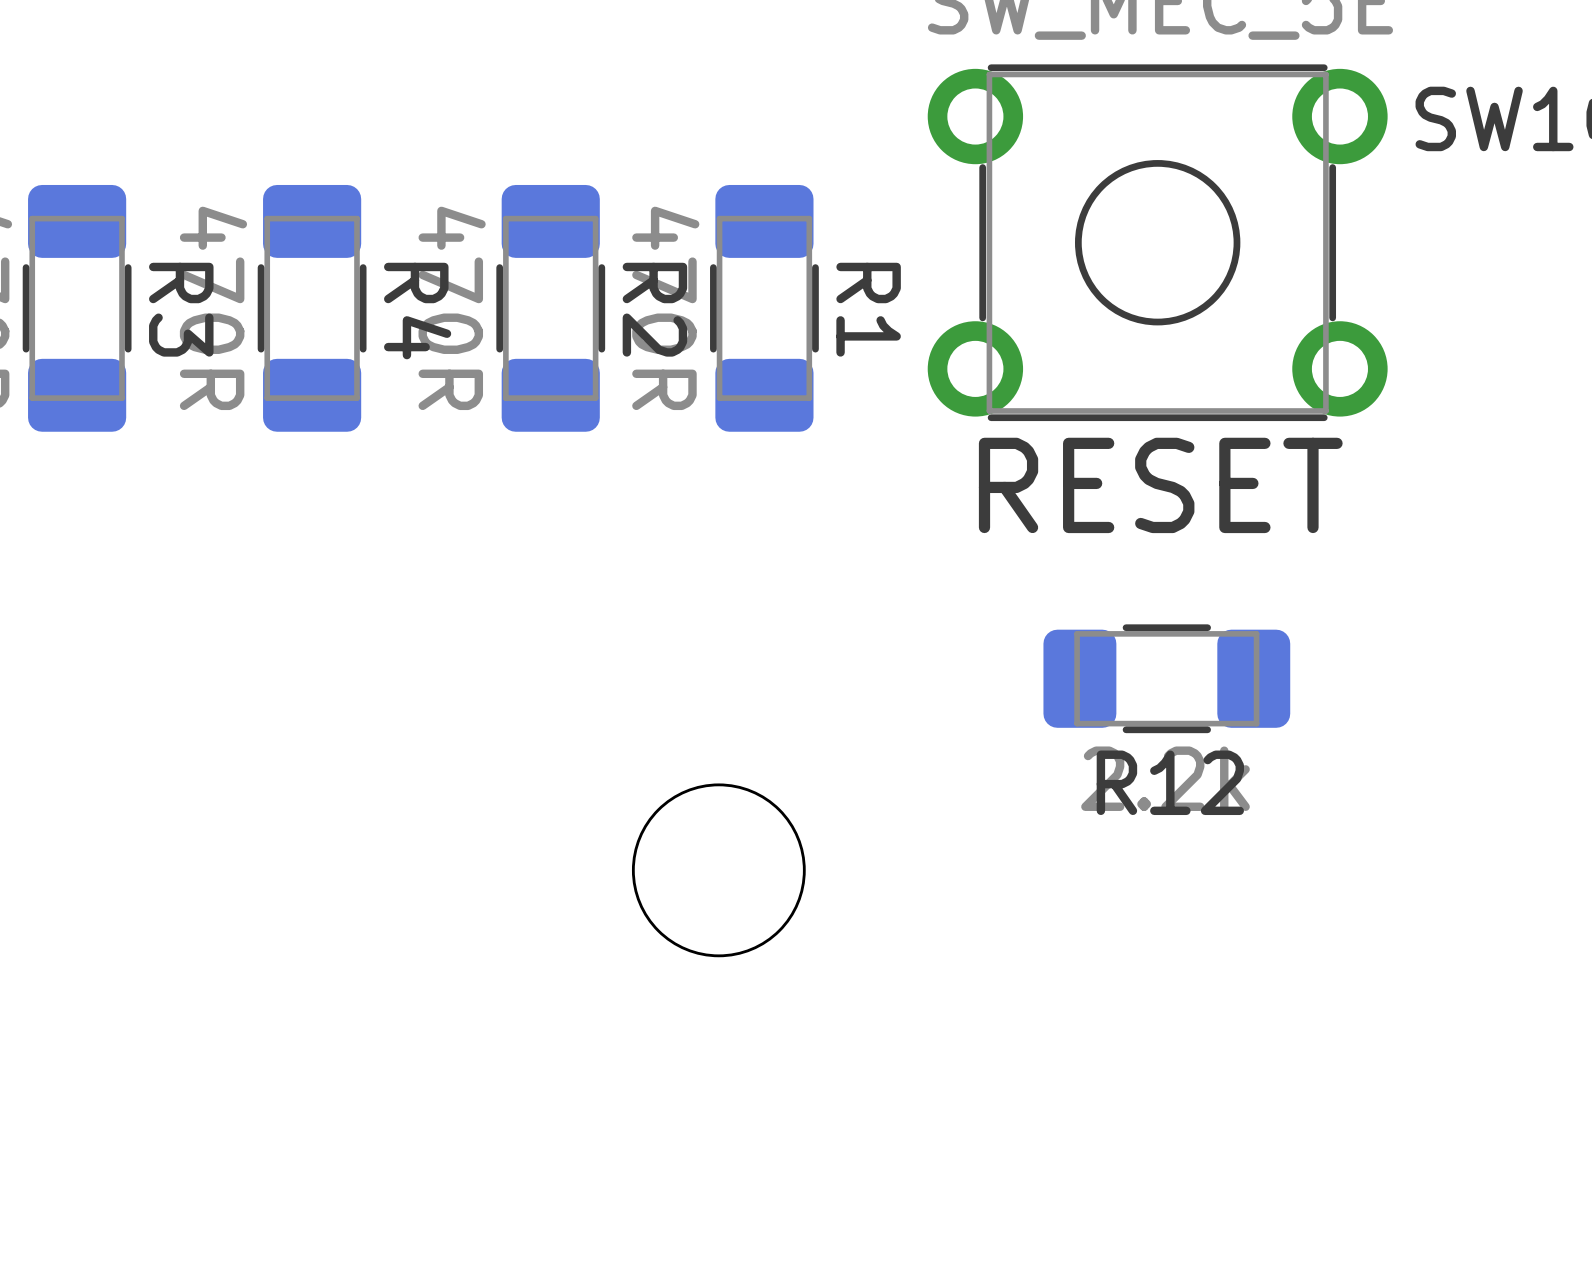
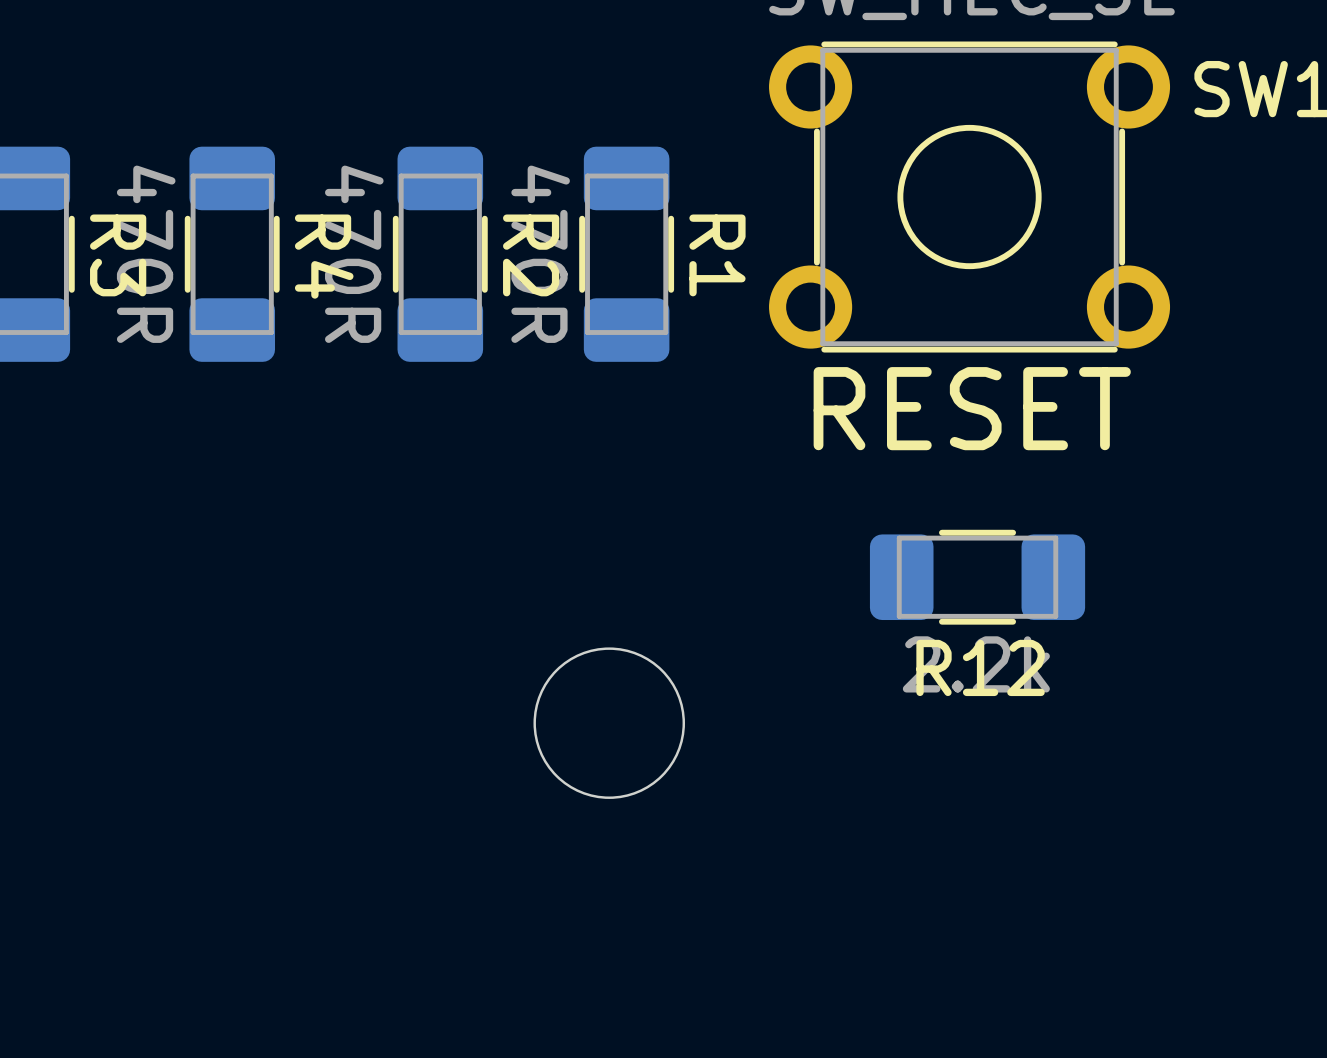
round board edge position: (718, 870) -> (609, 723)

